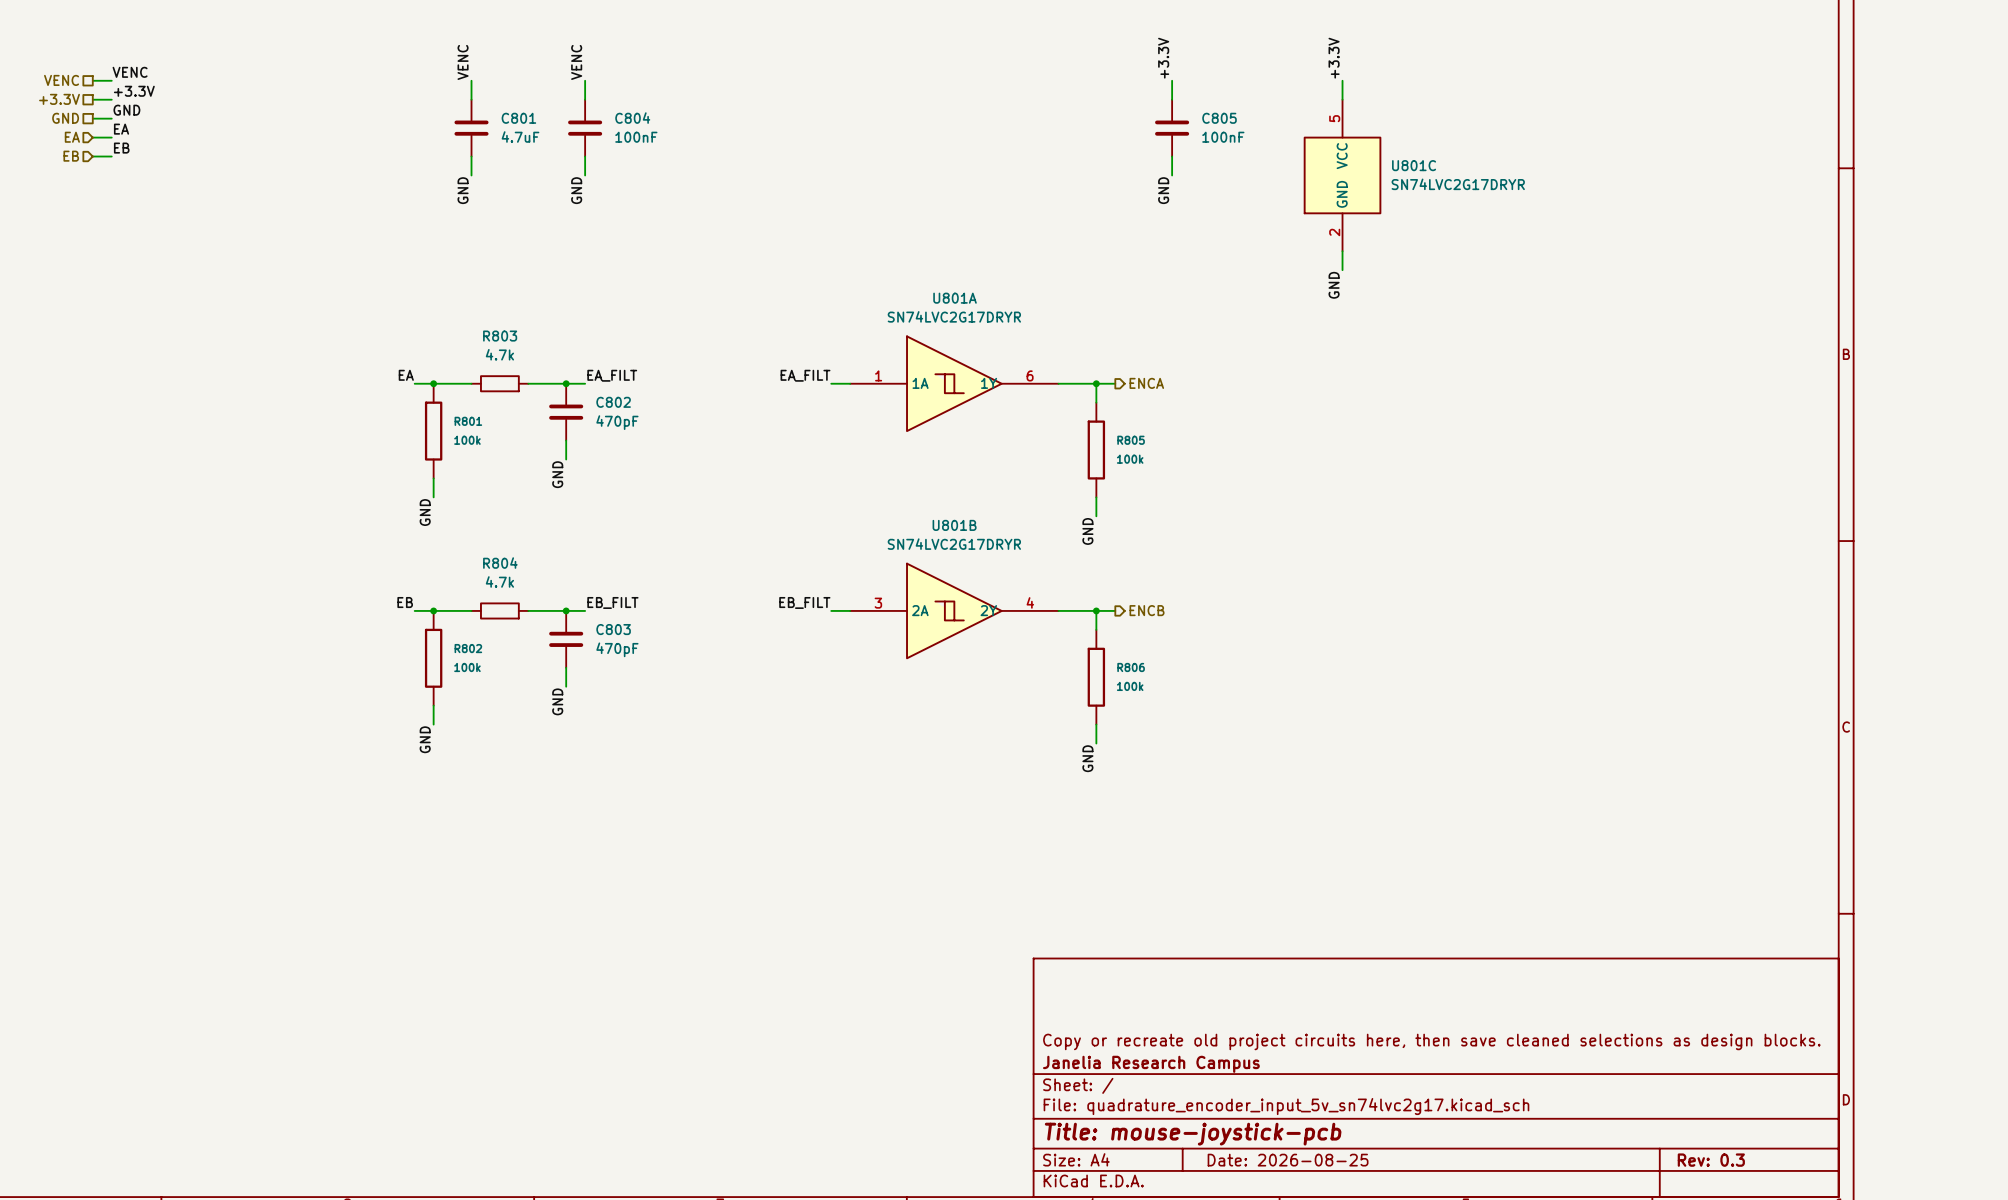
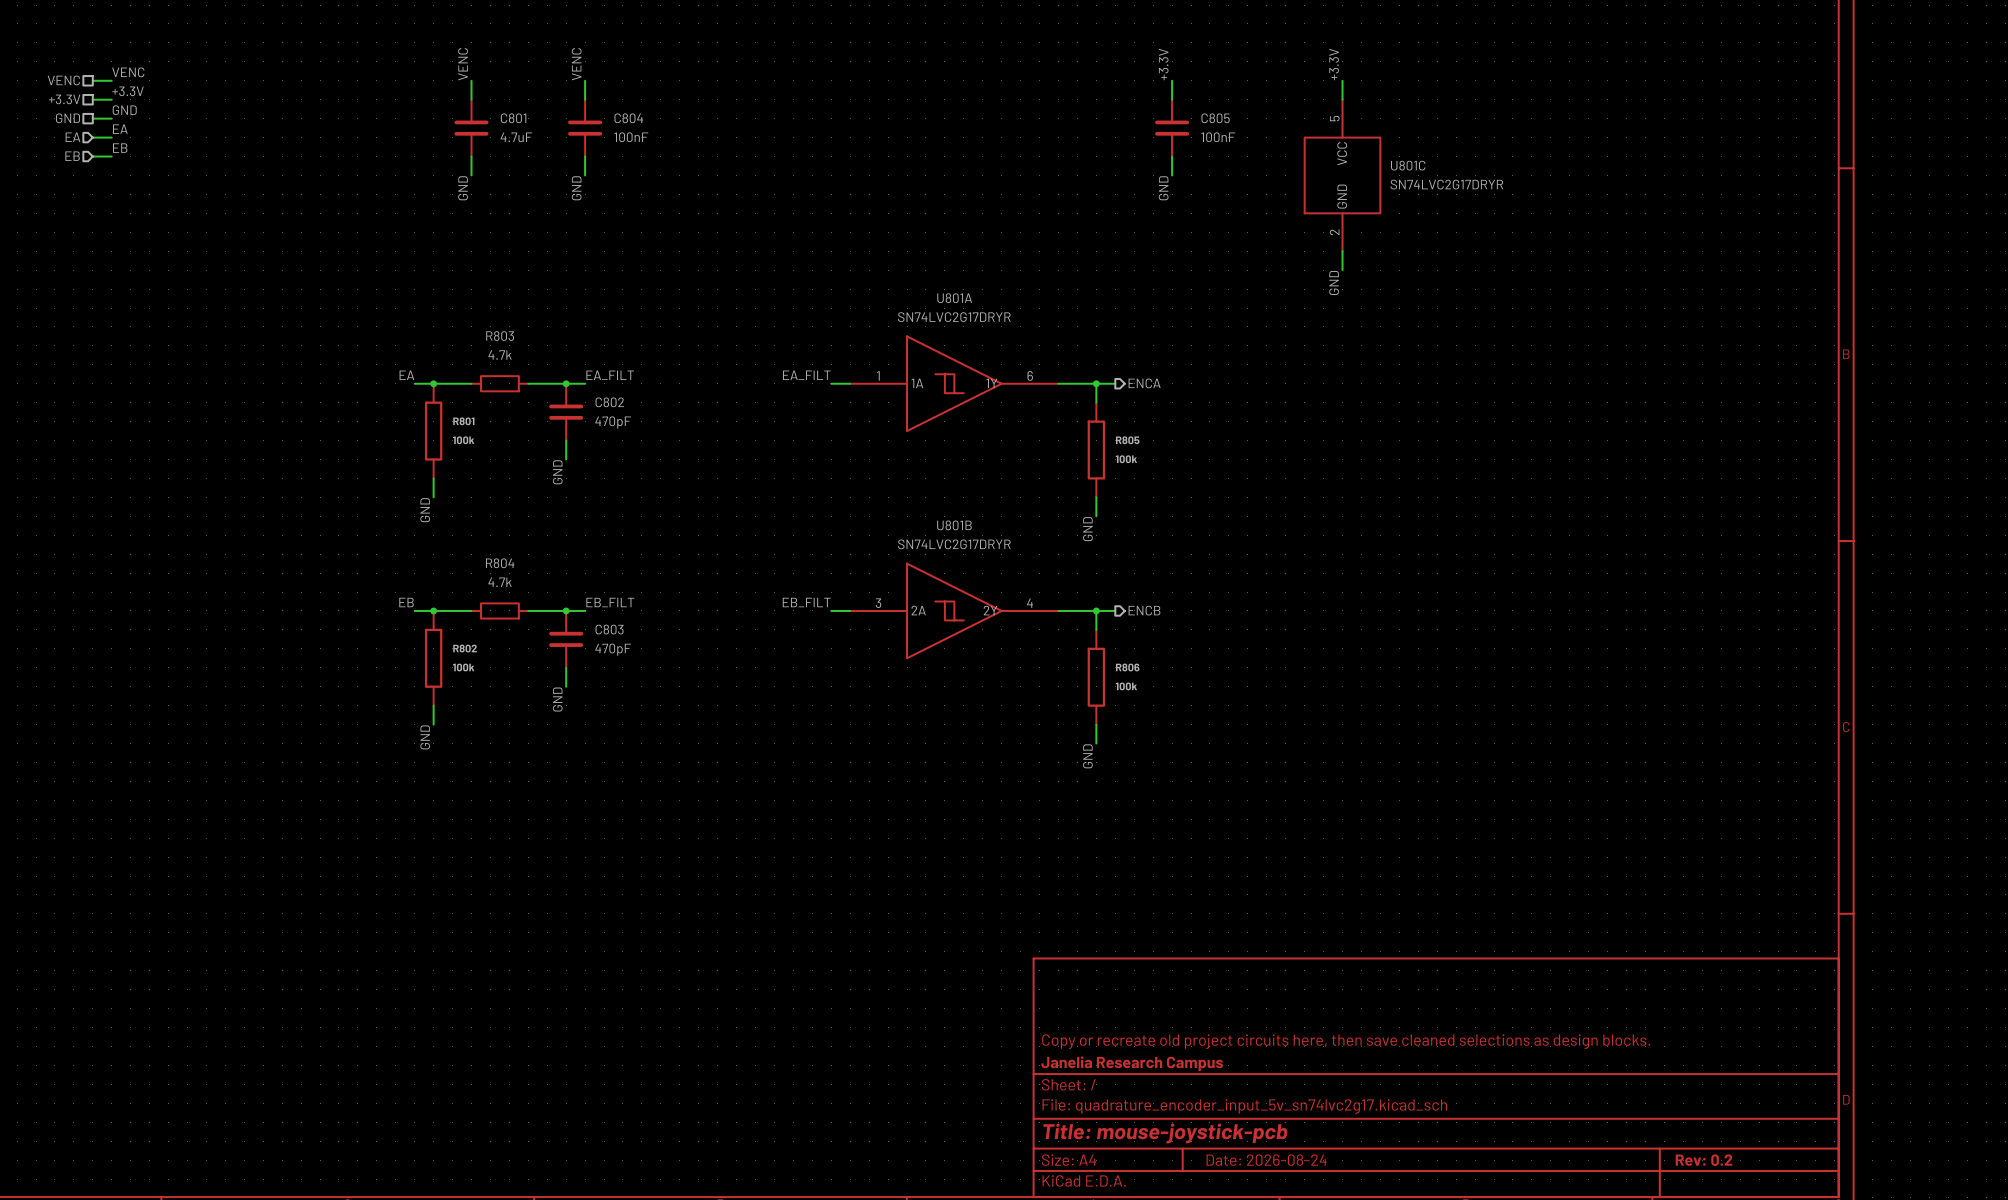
title block: Date: 2026-08-25 (1288, 1160) -> Date: 2026-08-24 (1266, 1160)
title block: Rev: 0.3 (1711, 1160) -> Rev: 0.2 (1703, 1160)

